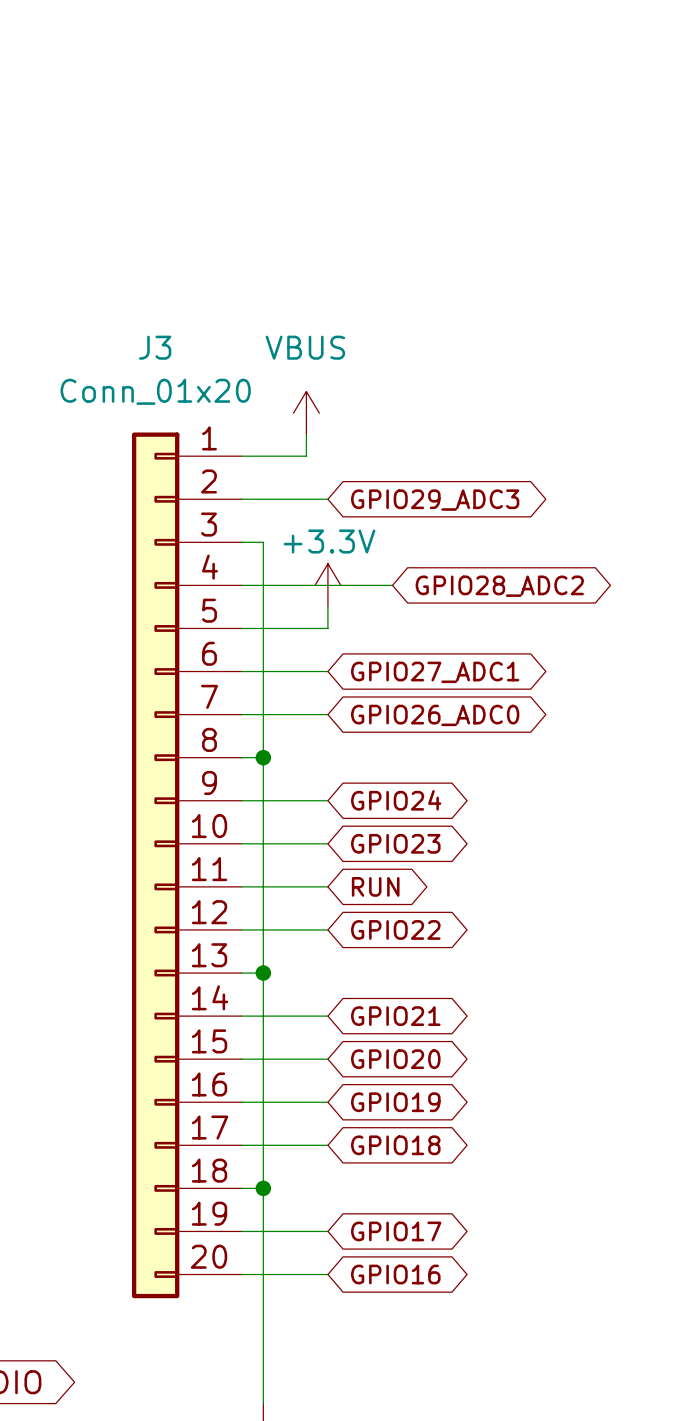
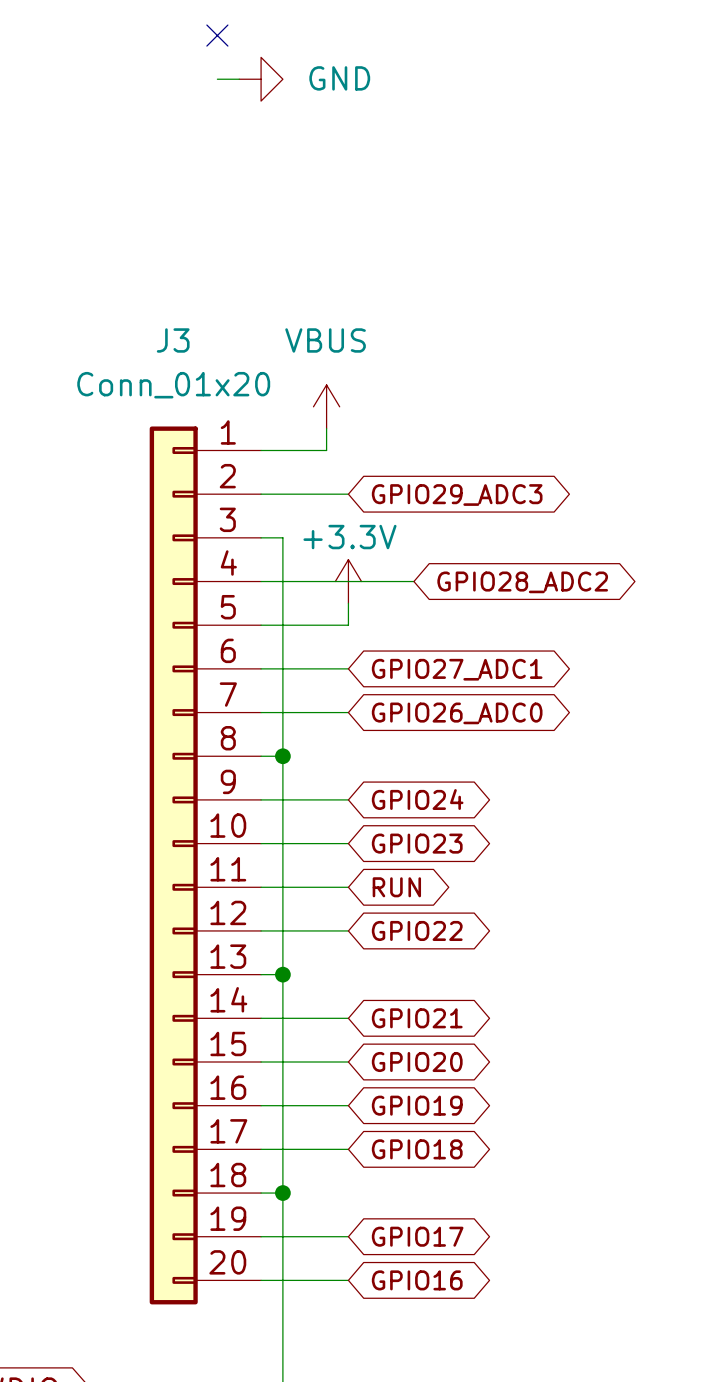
no-connect mark: none -> (217, 35)
wire: none -> (217, 79) (239, 79)
power symbol: none -> GND (261, 79)

